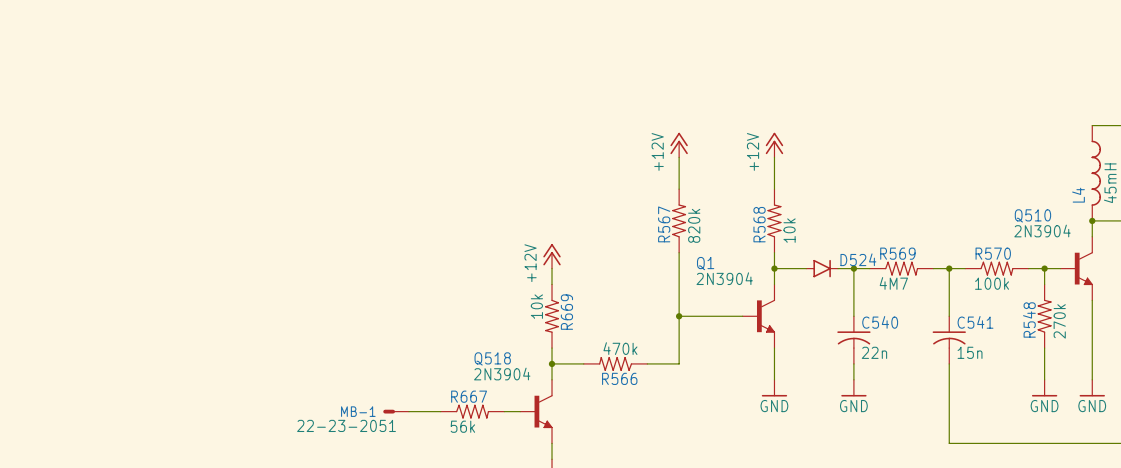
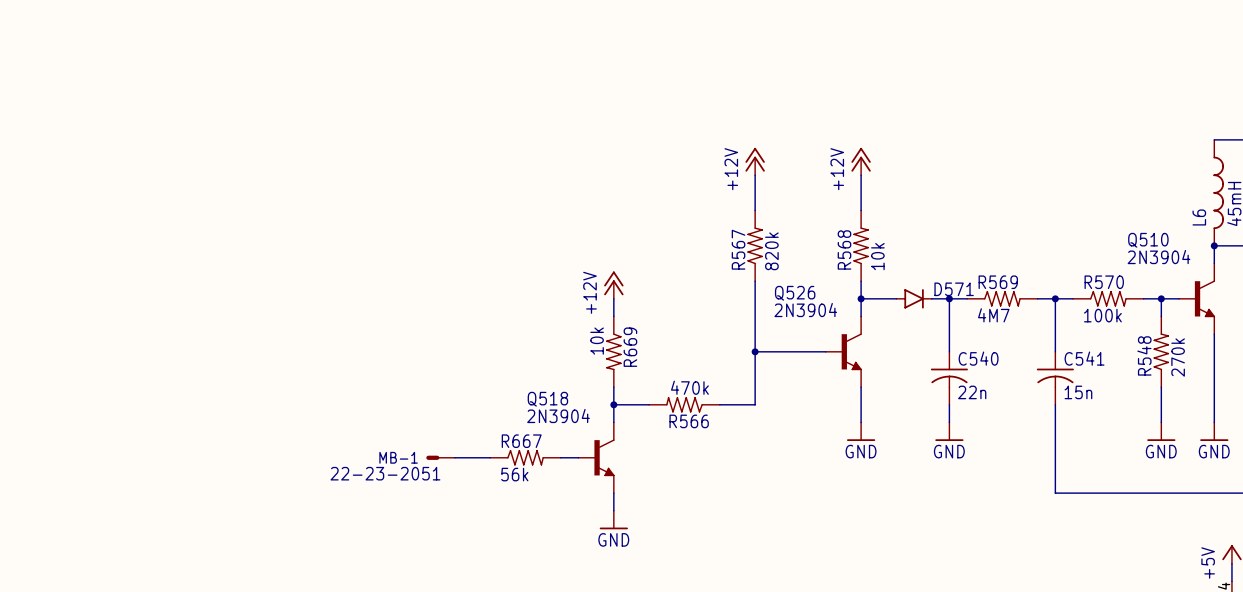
L4 name: L4 (1078, 195) -> L6 (1199, 217)
D524 name: D524 (858, 259) -> D571 (954, 289)
Q1 name: Q1 (705, 263) -> Q526 (795, 293)

